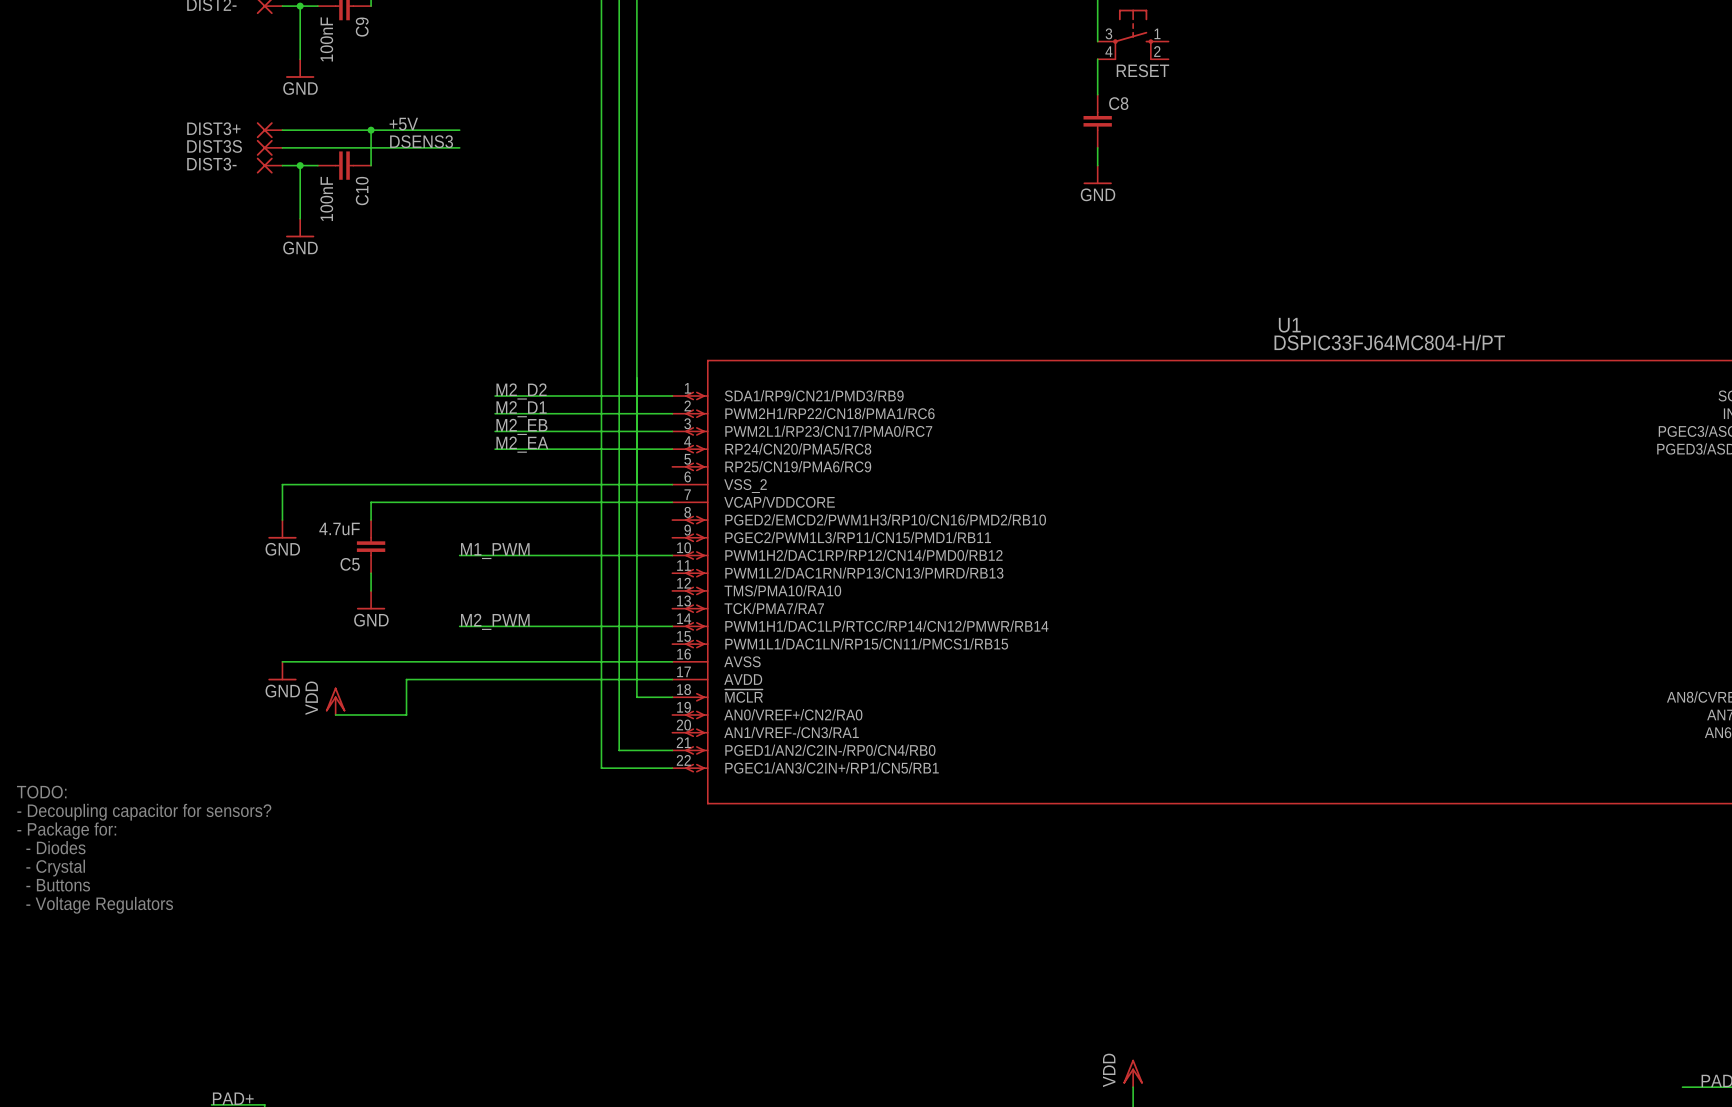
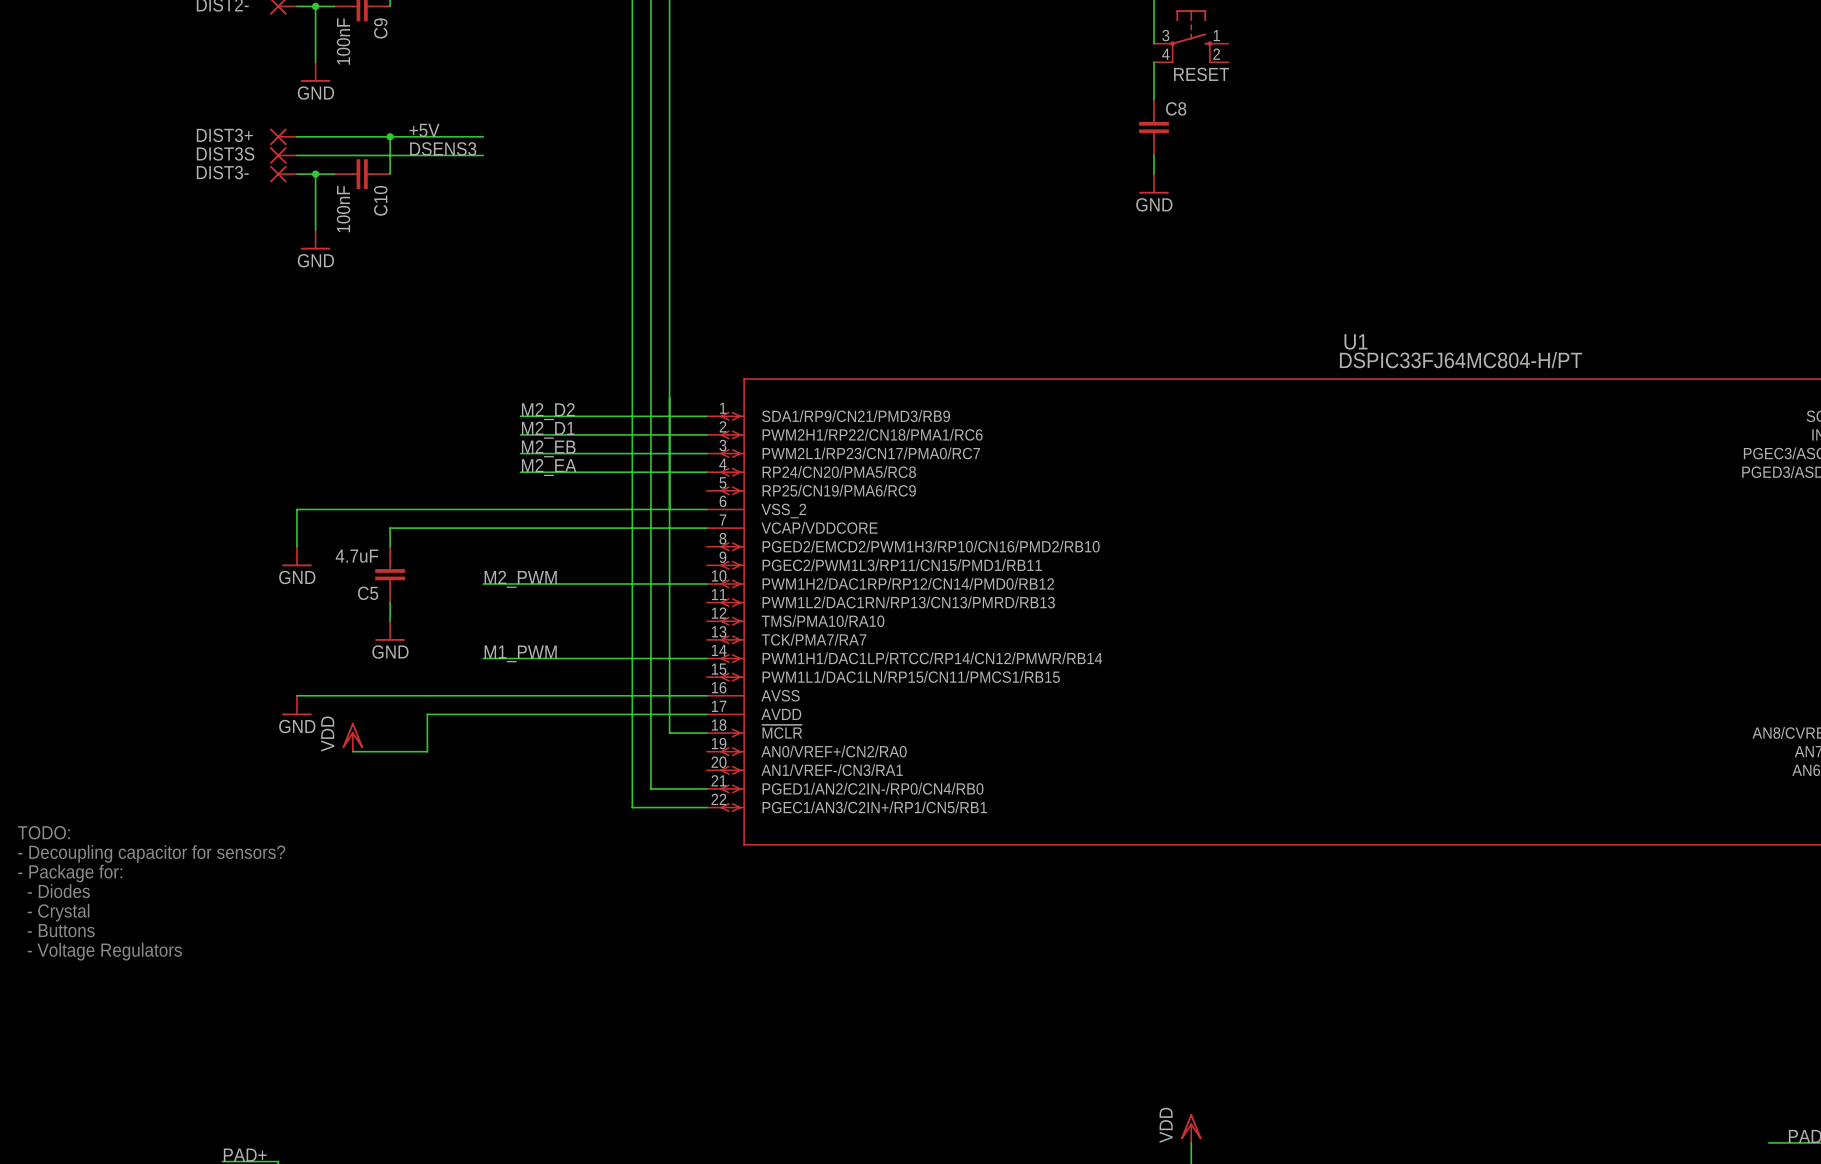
label: M1_PWM (495, 551) -> M2_PWM (520, 579)
label: M2_PWM (495, 621) -> M1_PWM (520, 653)

